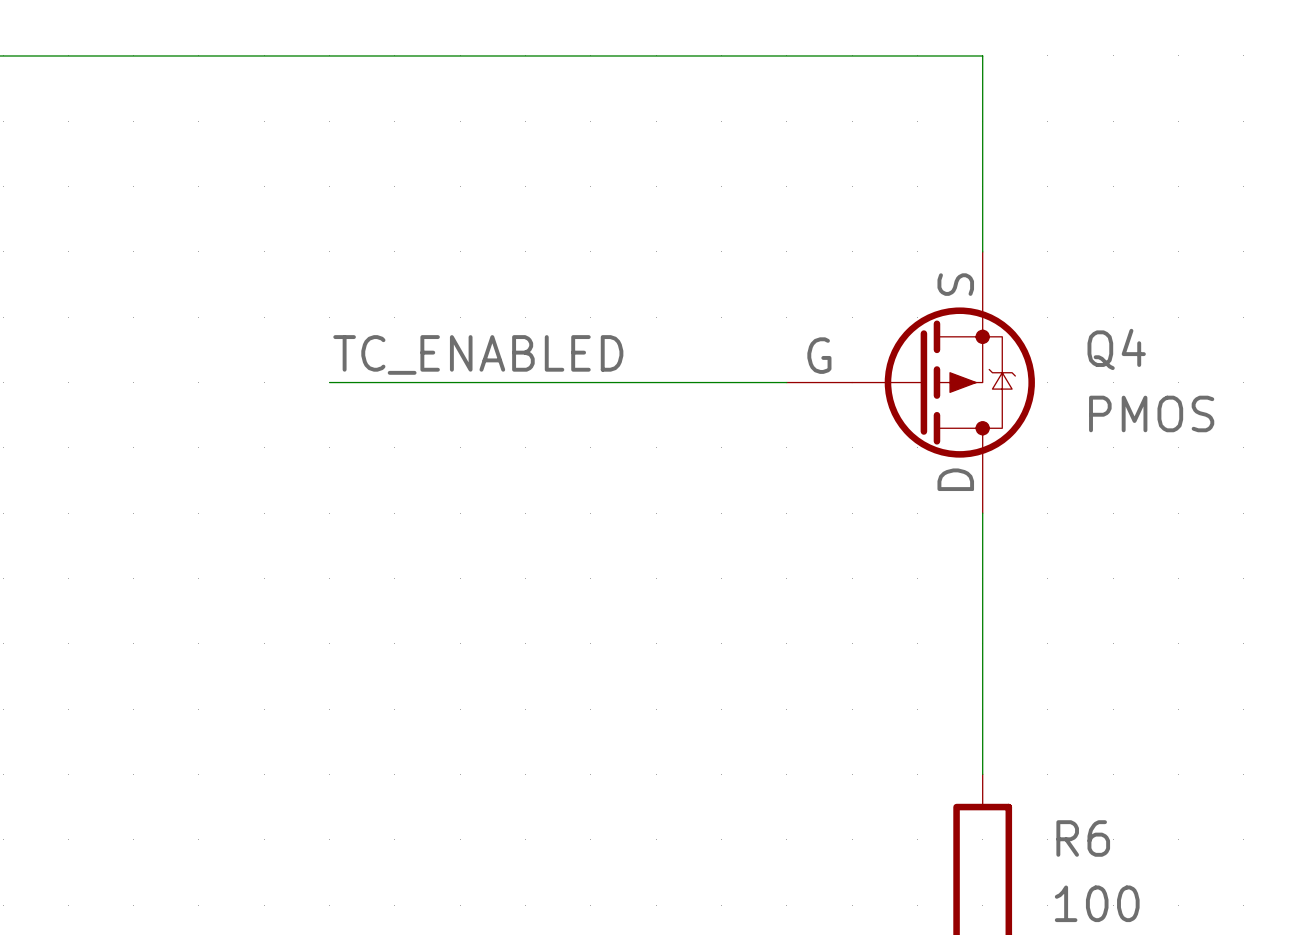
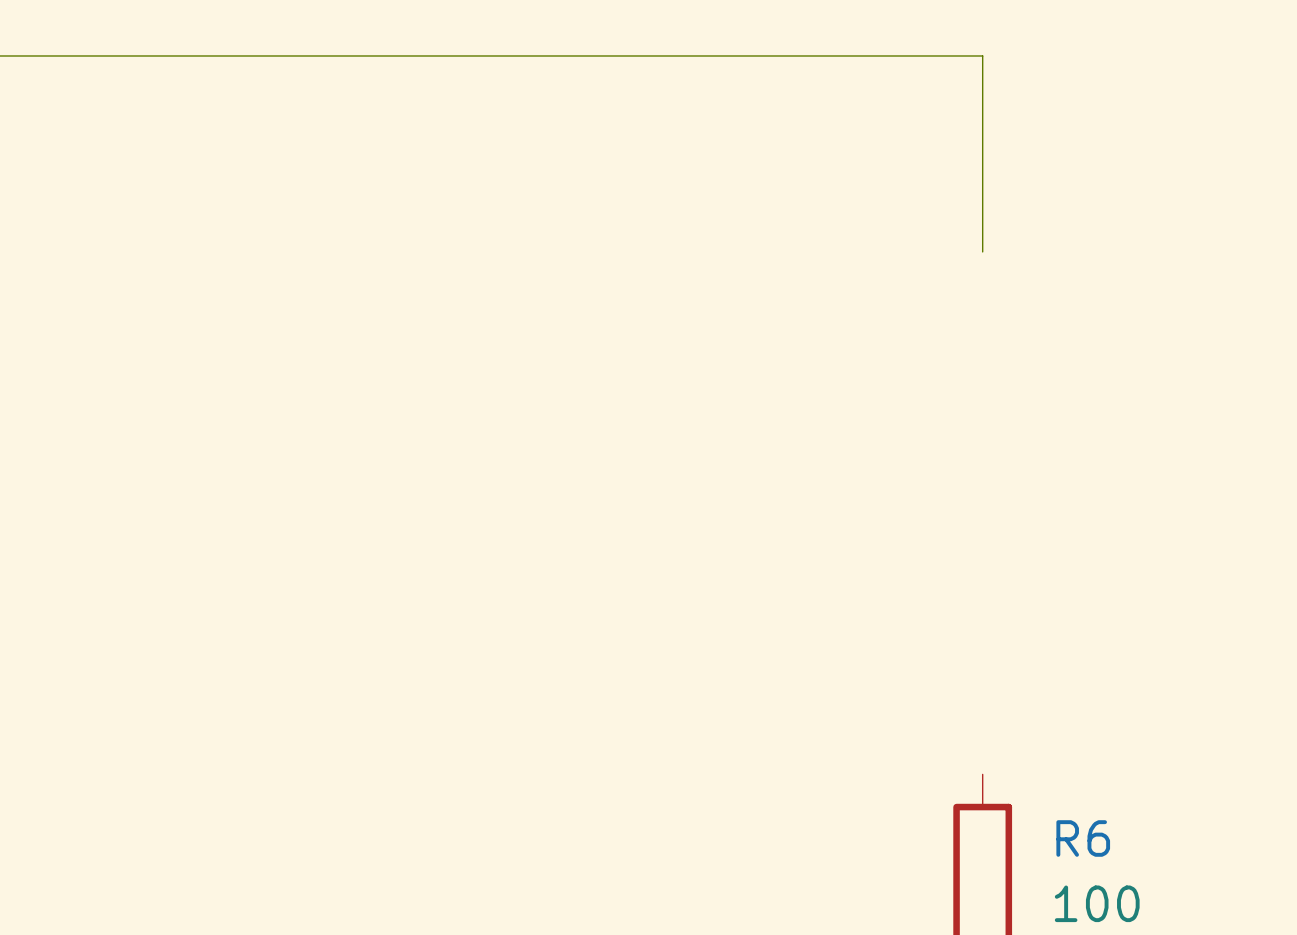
label: TC_ENABLED (478, 354) -> none
wire: (329, 382) (786, 382) -> none
Q4: PMOS (910, 382) -> none
wire: (982, 513) (982, 774) -> none

